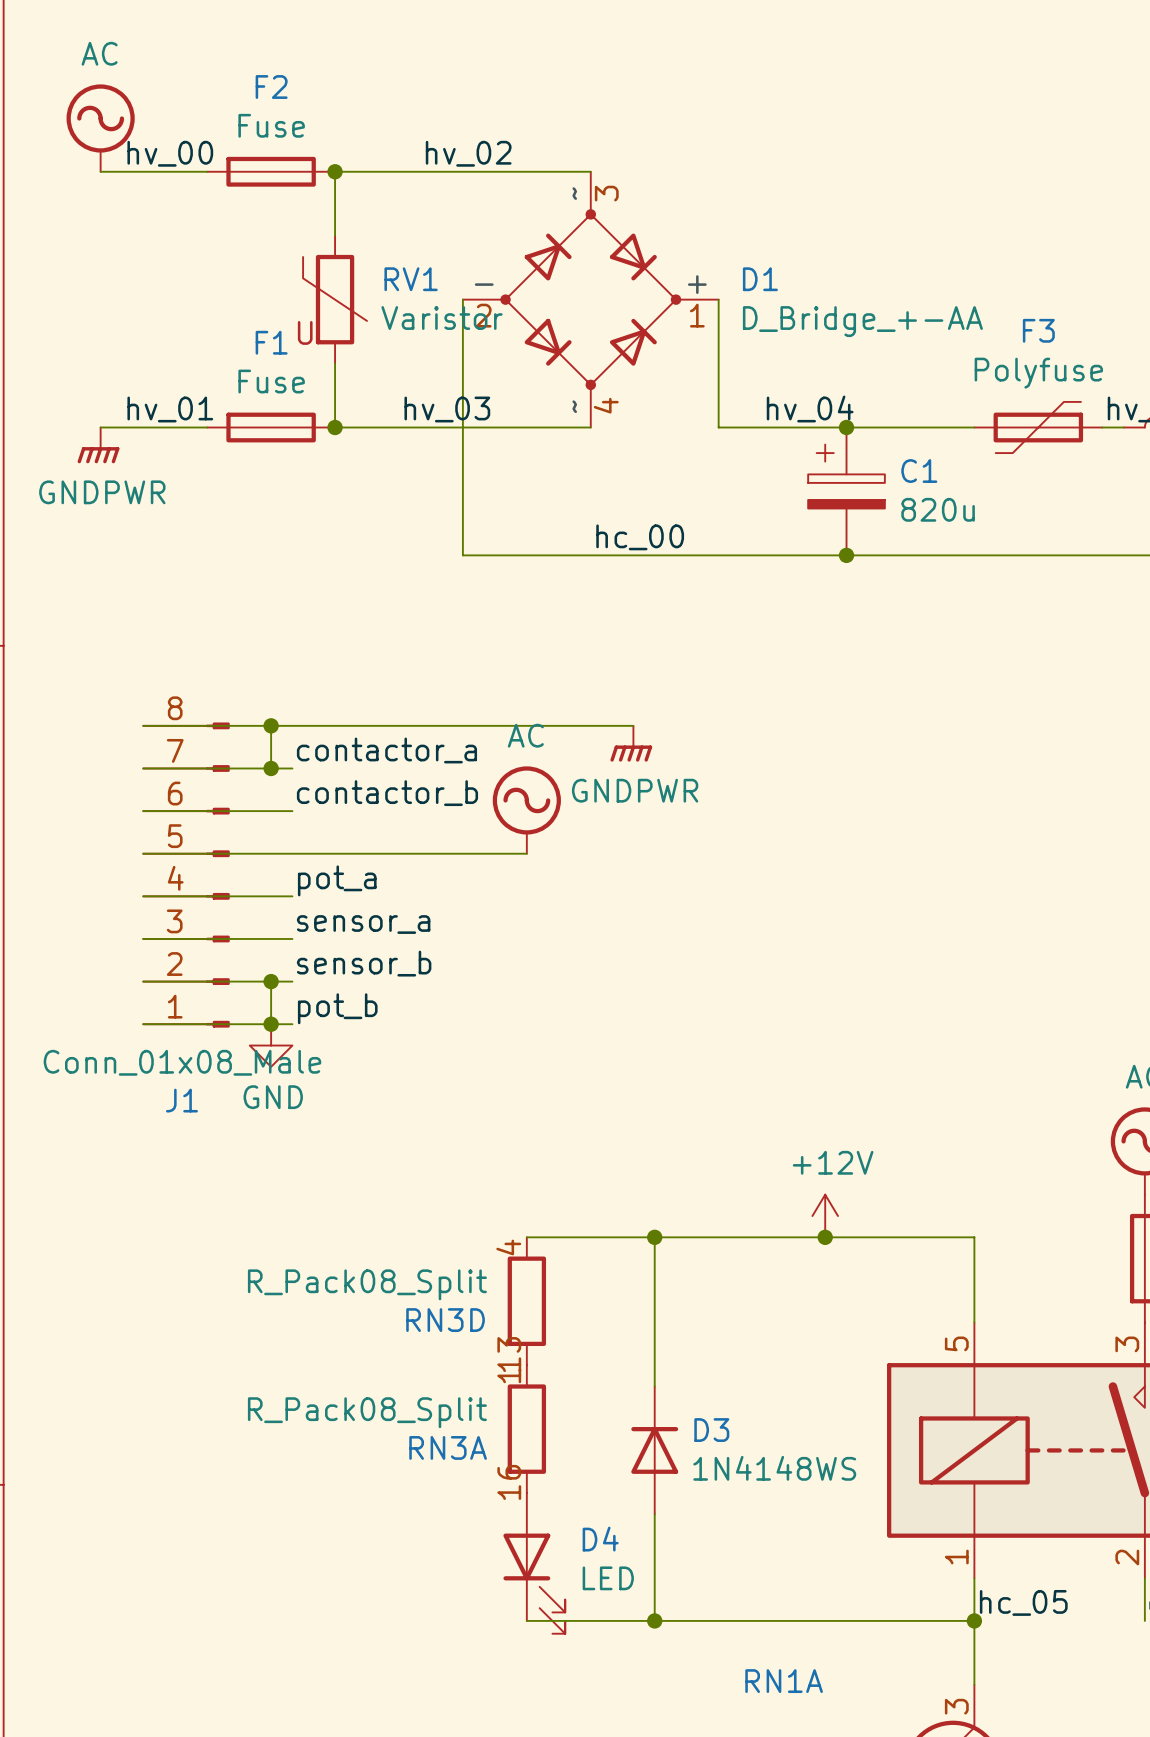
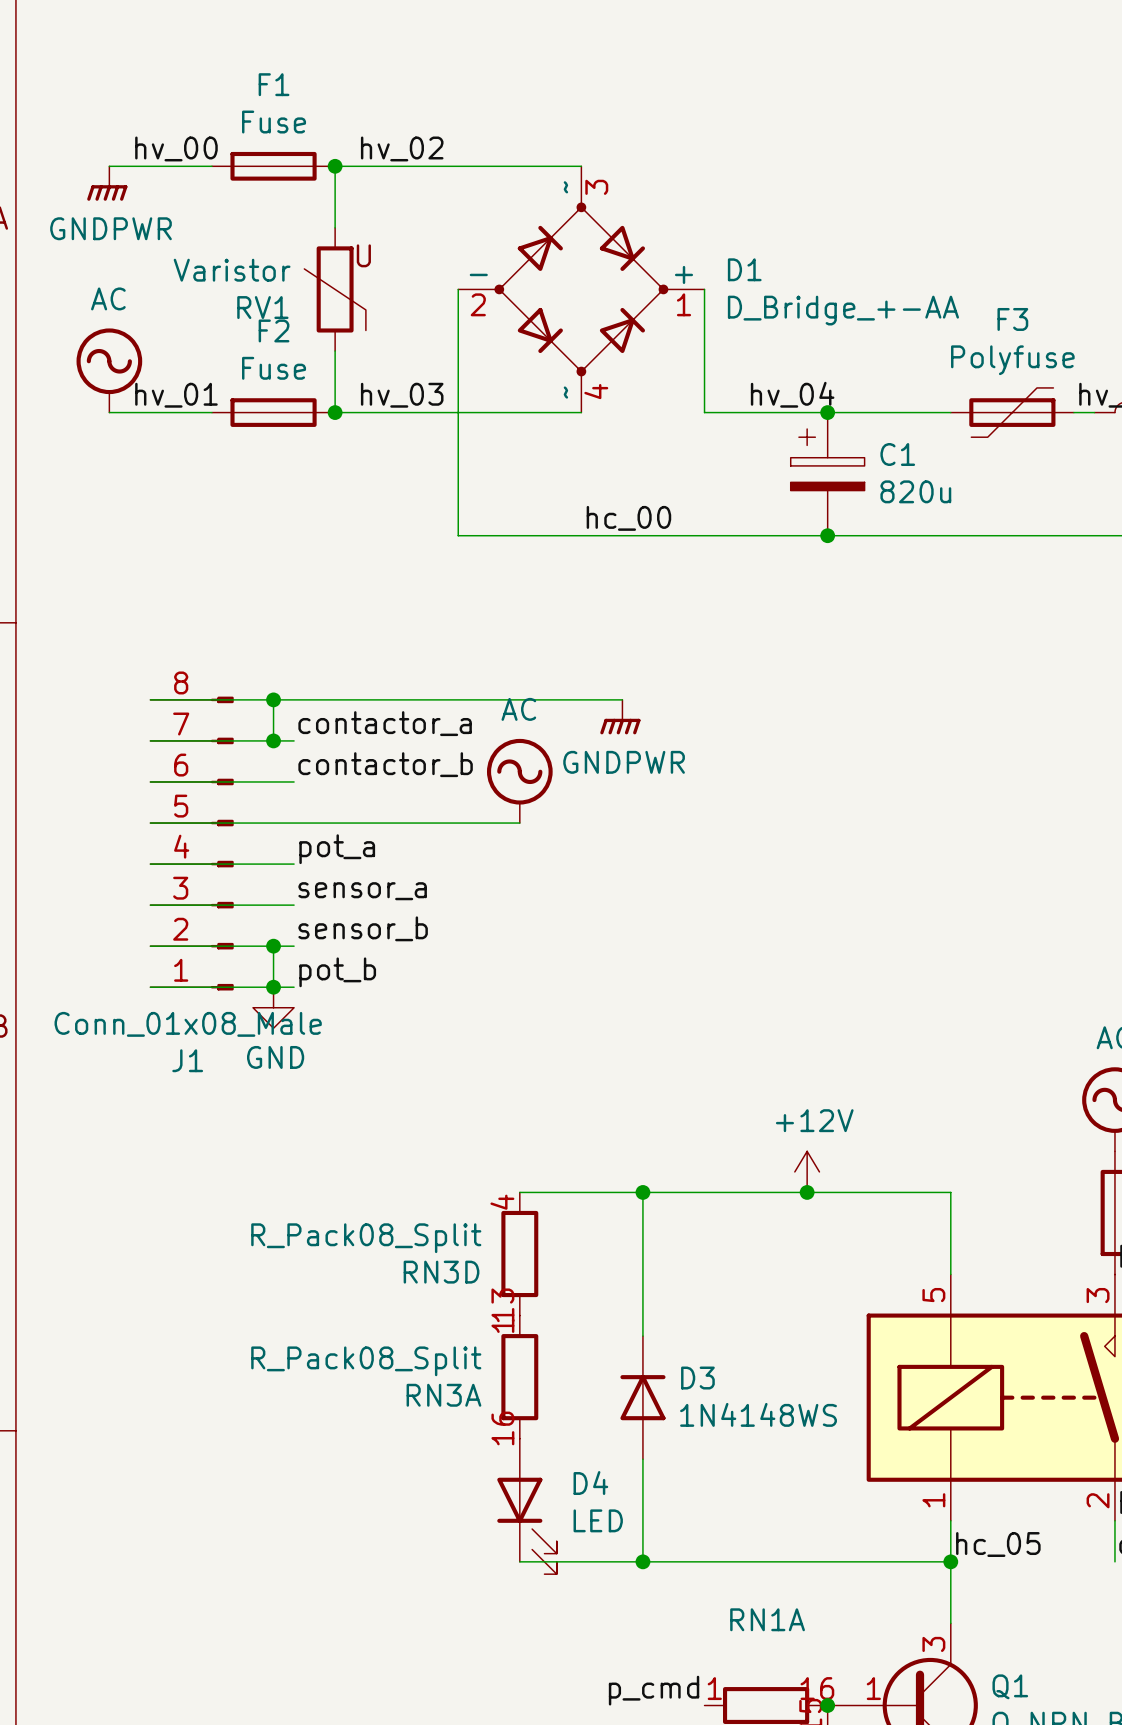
F2 name: F2 (271, 87) -> F1 (274, 84)
power symbol position: AC (100, 128) -> AC (109, 370)
label position: hv_02 (468, 153) -> hv_02 (402, 148)
RV1 rotation: 0° (335, 299) -> 180° (335, 289)
F1 name: F1 (271, 342) -> F2 (274, 330)
label position: hv_03 (447, 409) -> hv_03 (402, 395)
power symbol position: GNDPWR (98, 445) -> GNDPWR (107, 183)

